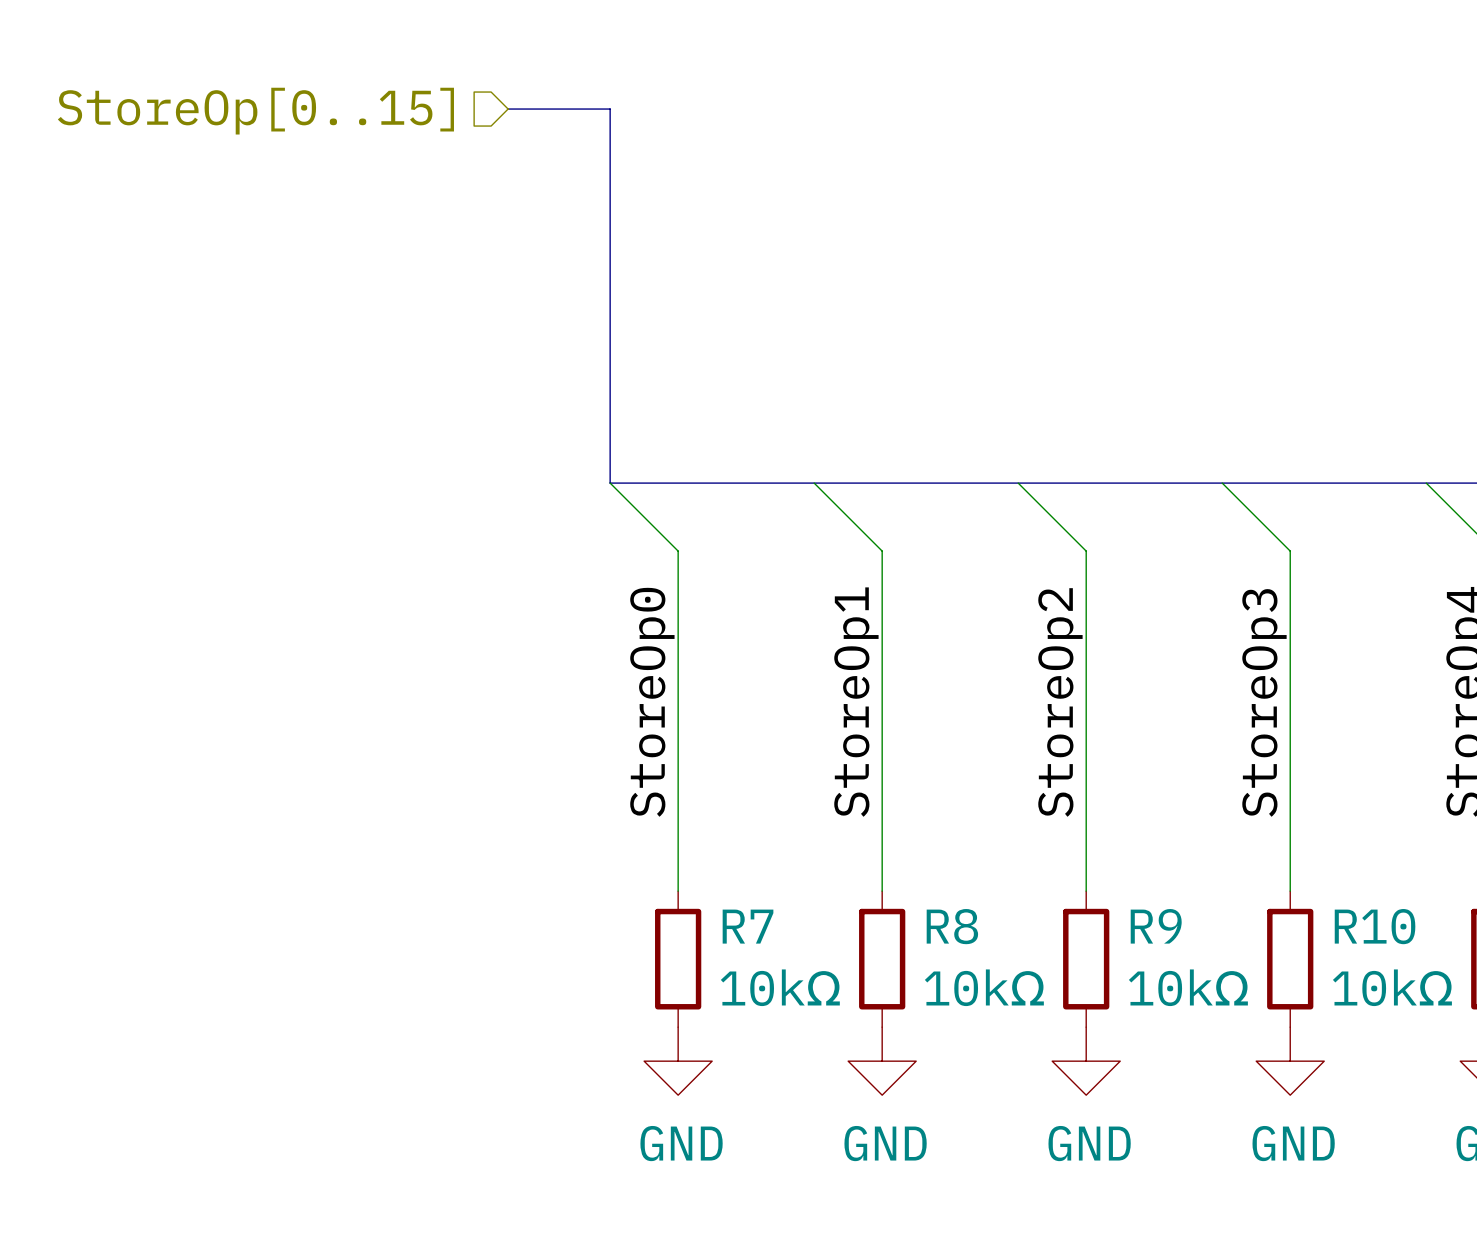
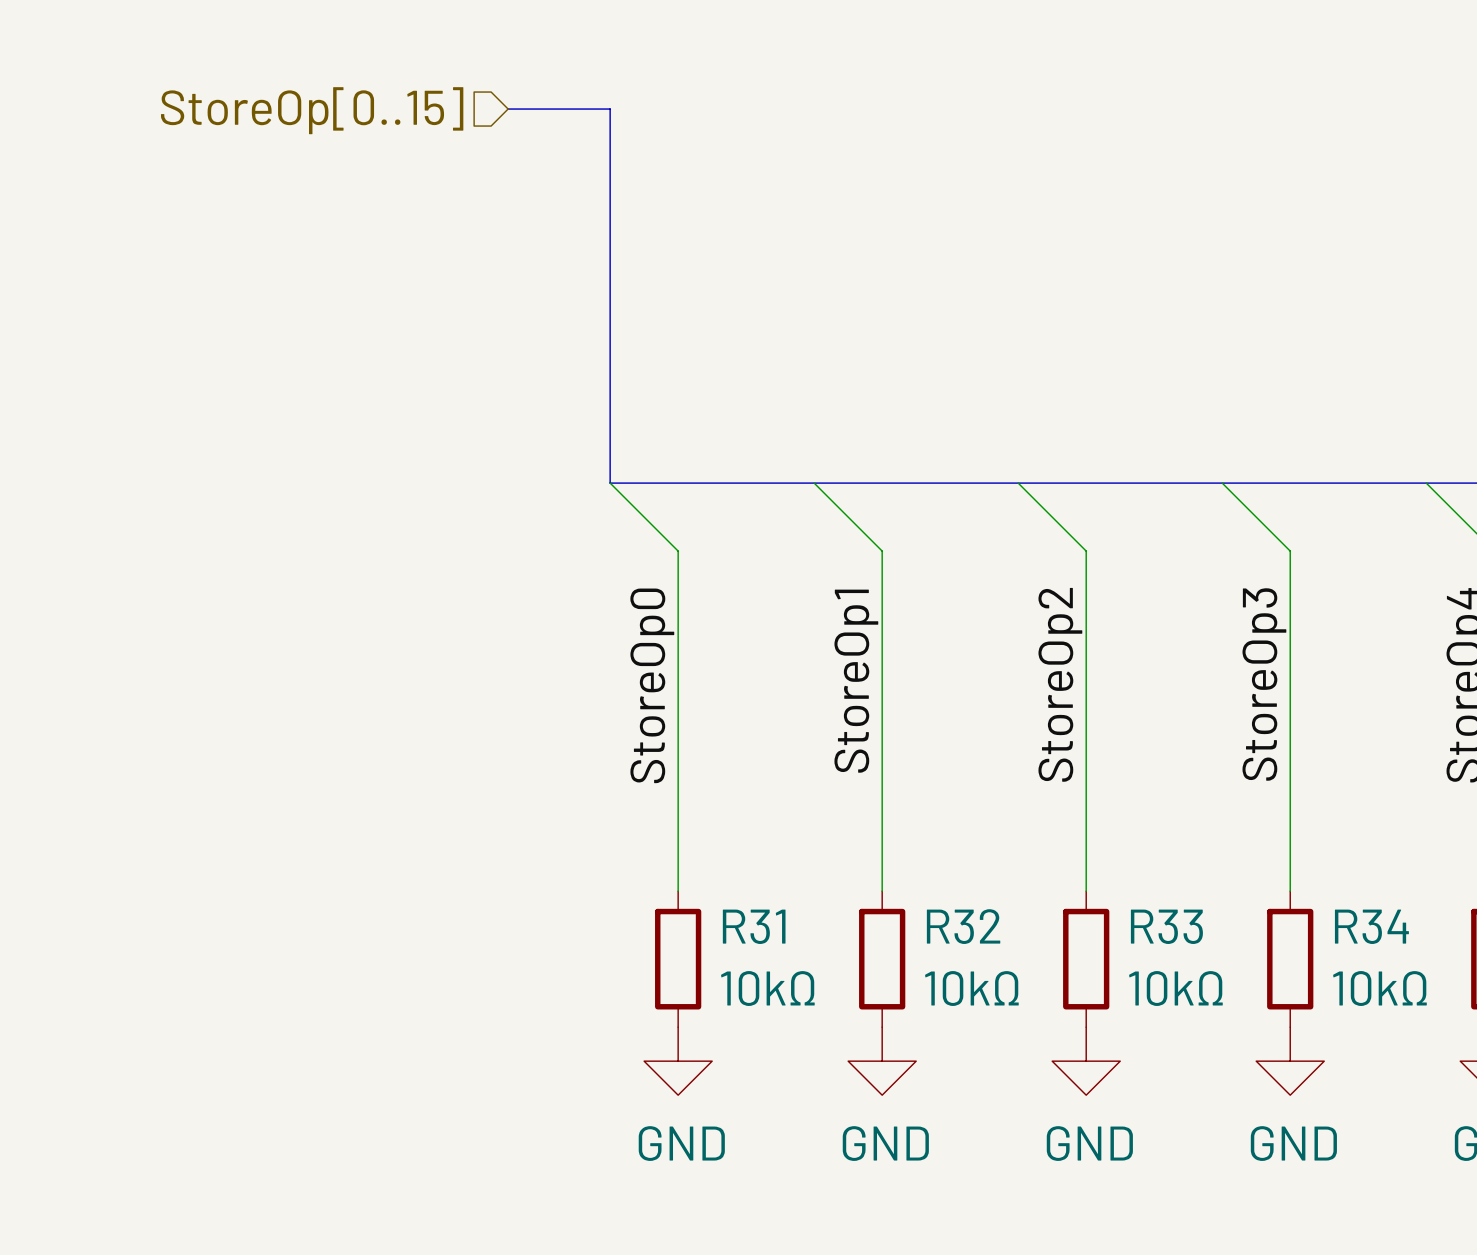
R7 name: R7 (748, 926) -> R31 (754, 926)
R8 name: R8 (952, 926) -> R32 (963, 926)
R9 name: R9 (1156, 926) -> R33 (1166, 926)
R10 name: R10 (1375, 926) -> R34 (1371, 926)

